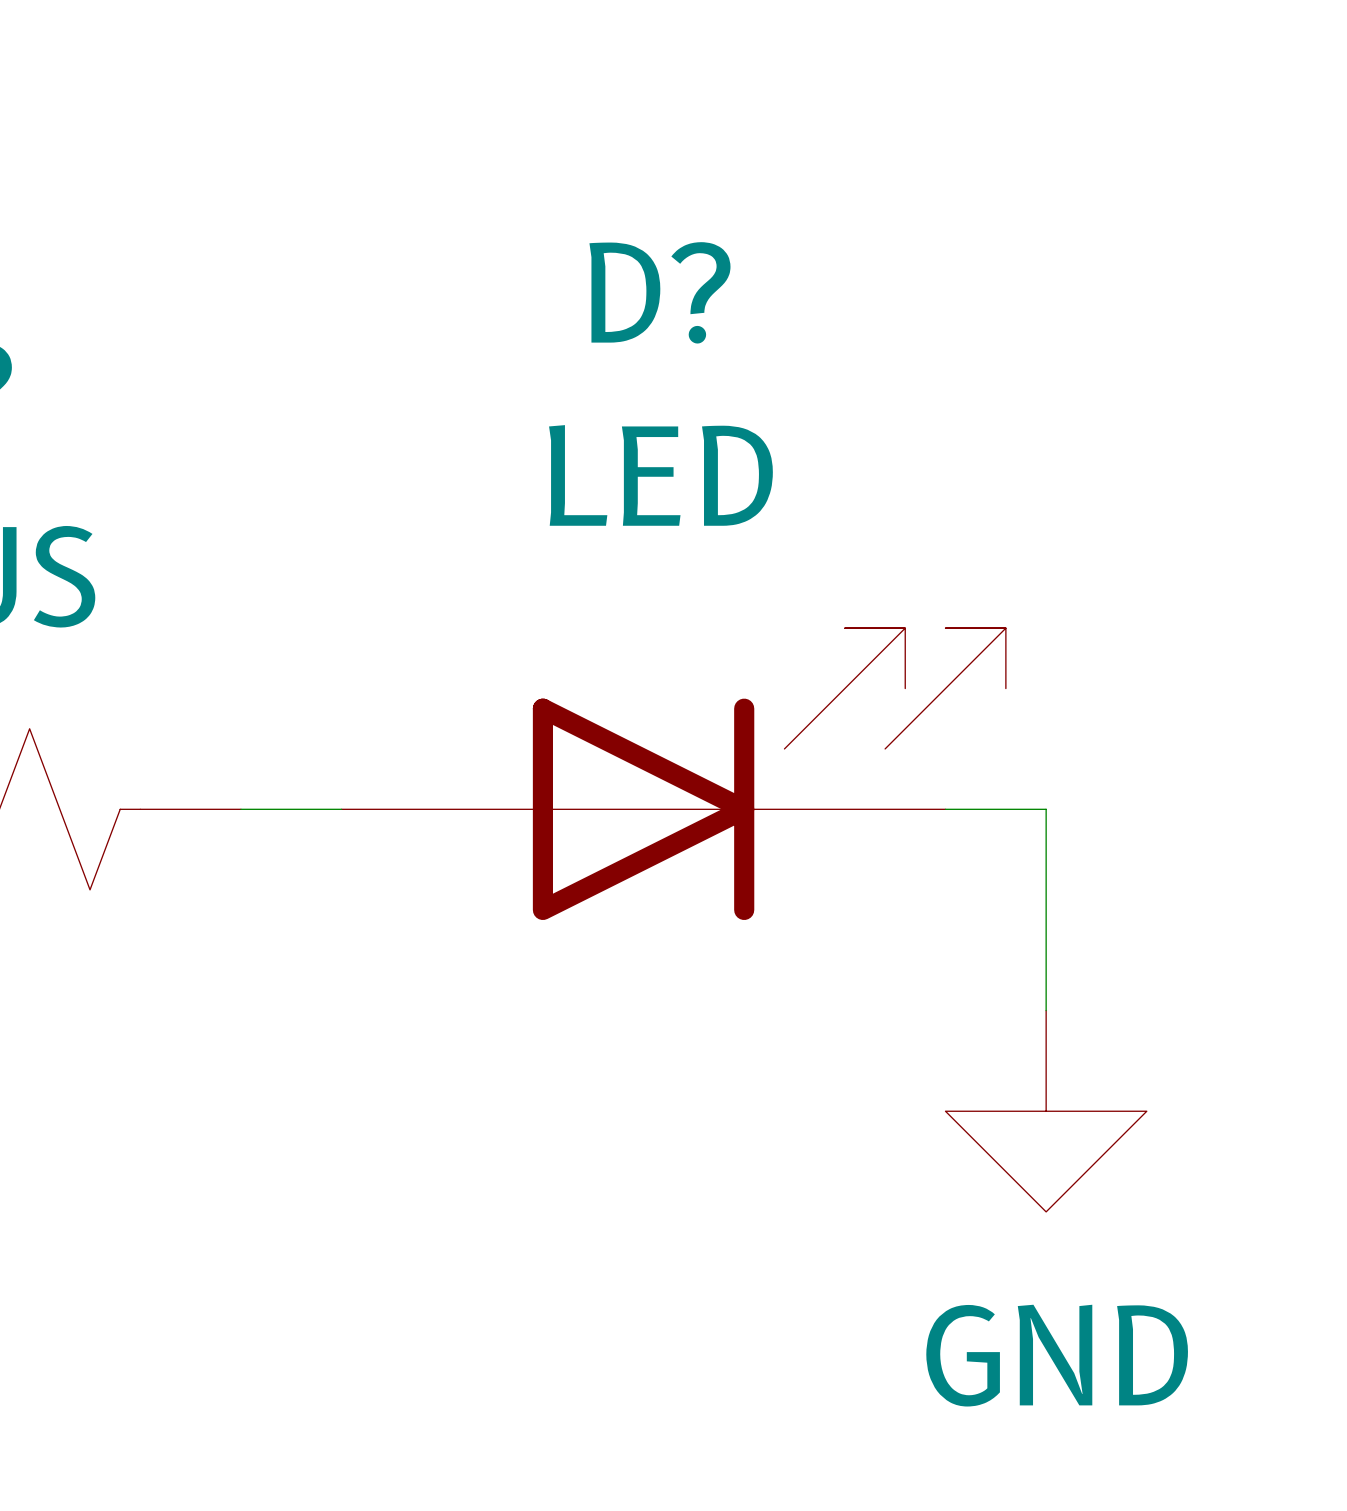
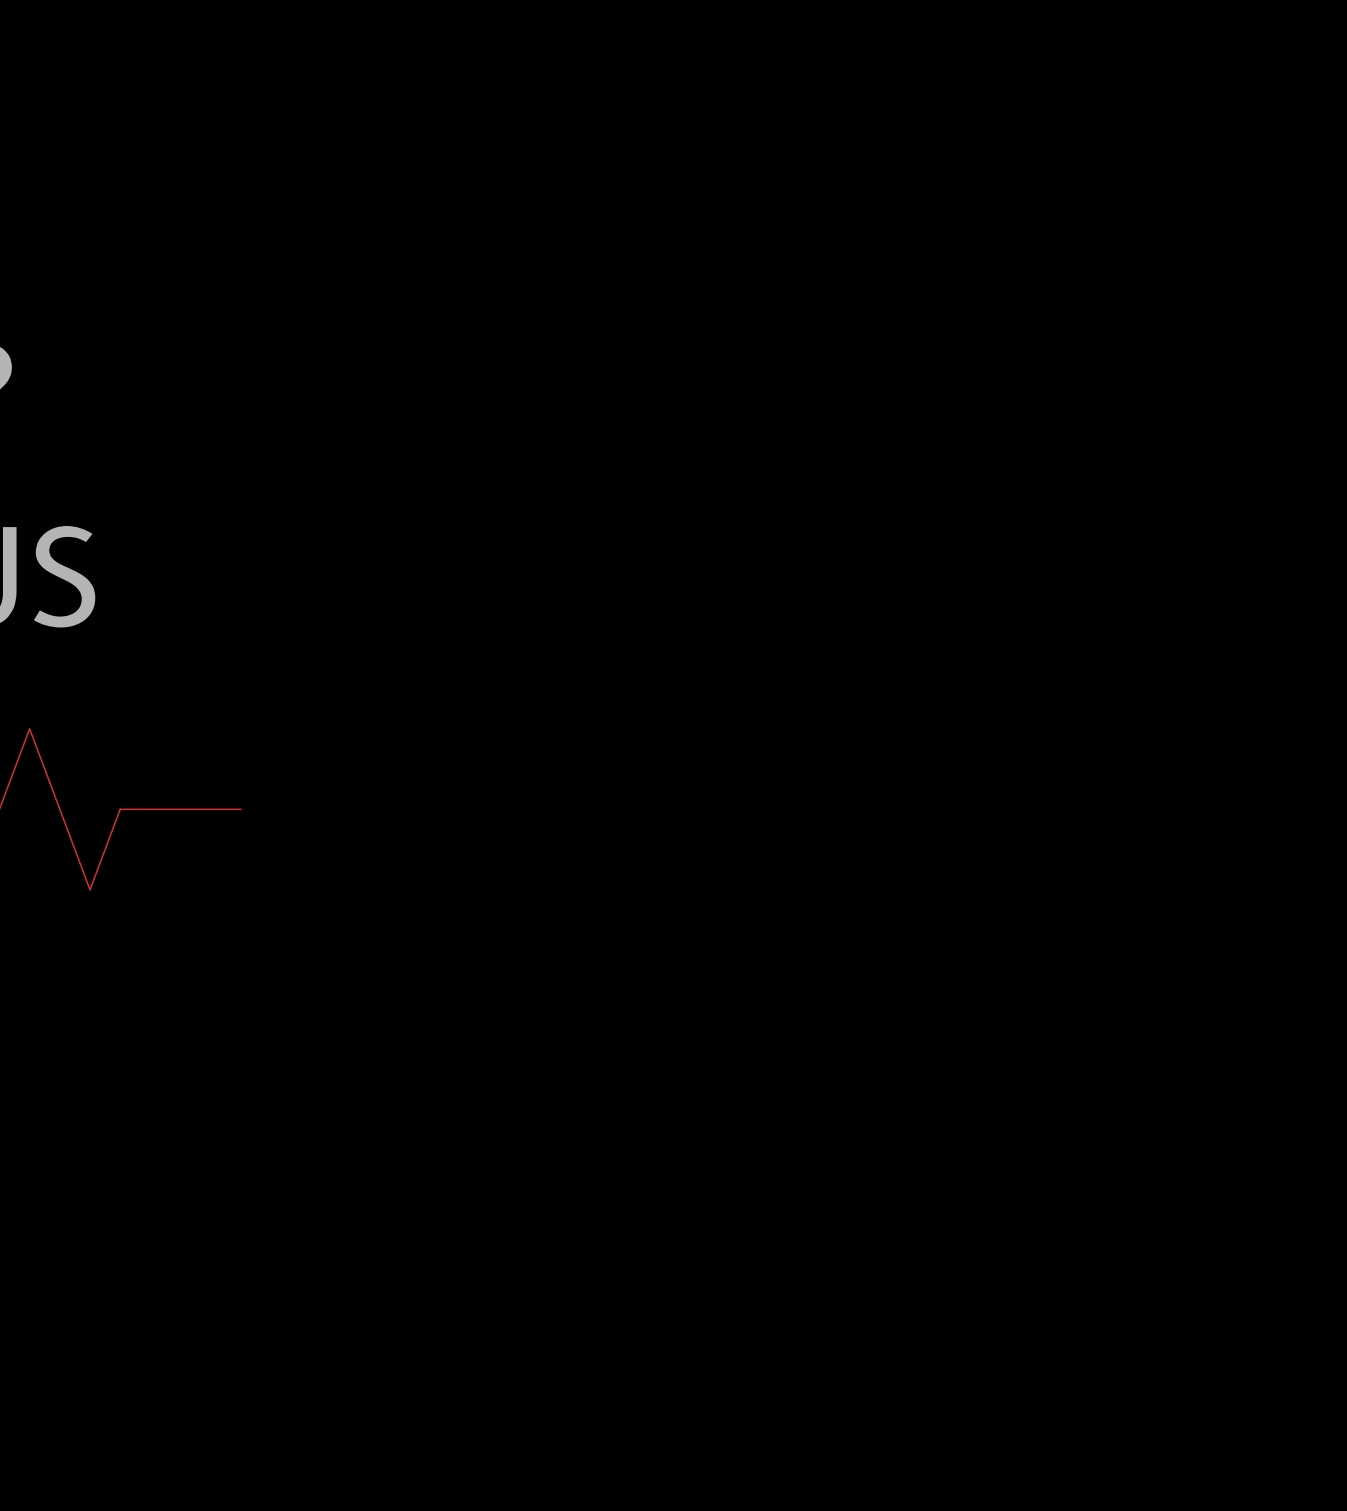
D?: LED (673, 774) -> none
wire: (240, 809) (341, 809) -> none
wire: (945, 809) (1046, 809) (1046, 1010) -> none
power symbol: GND (1046, 1111) -> none

